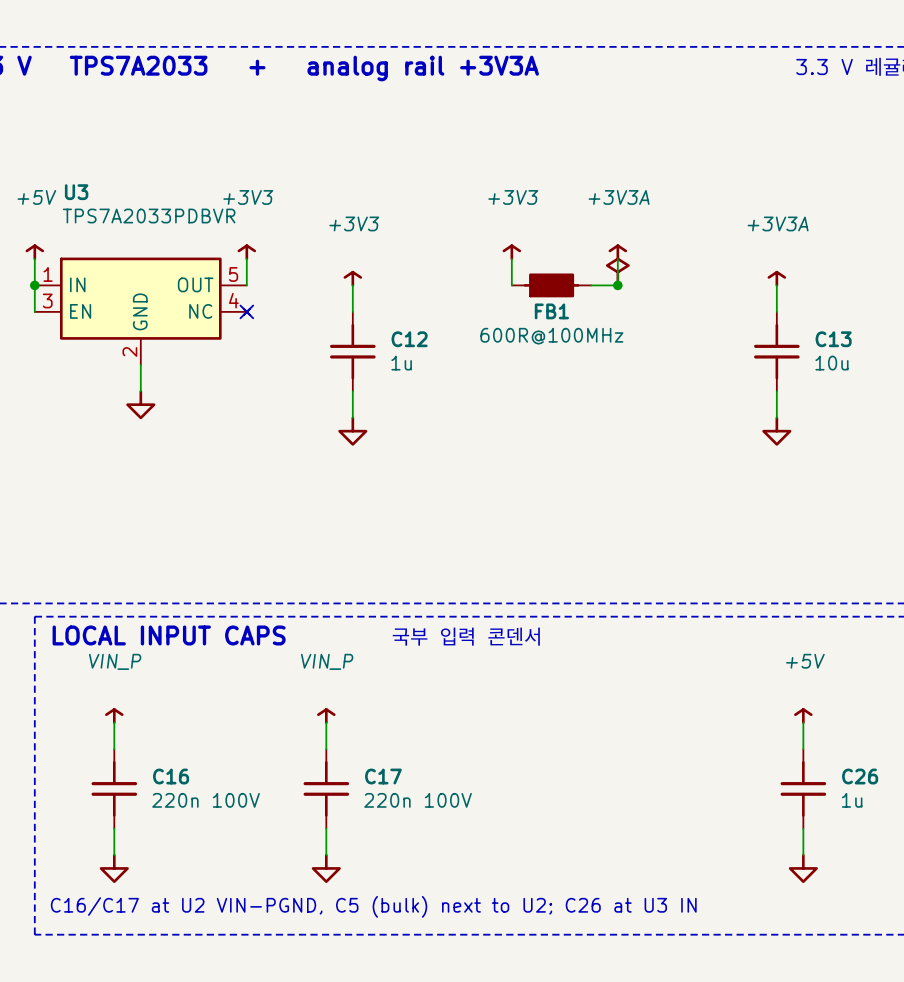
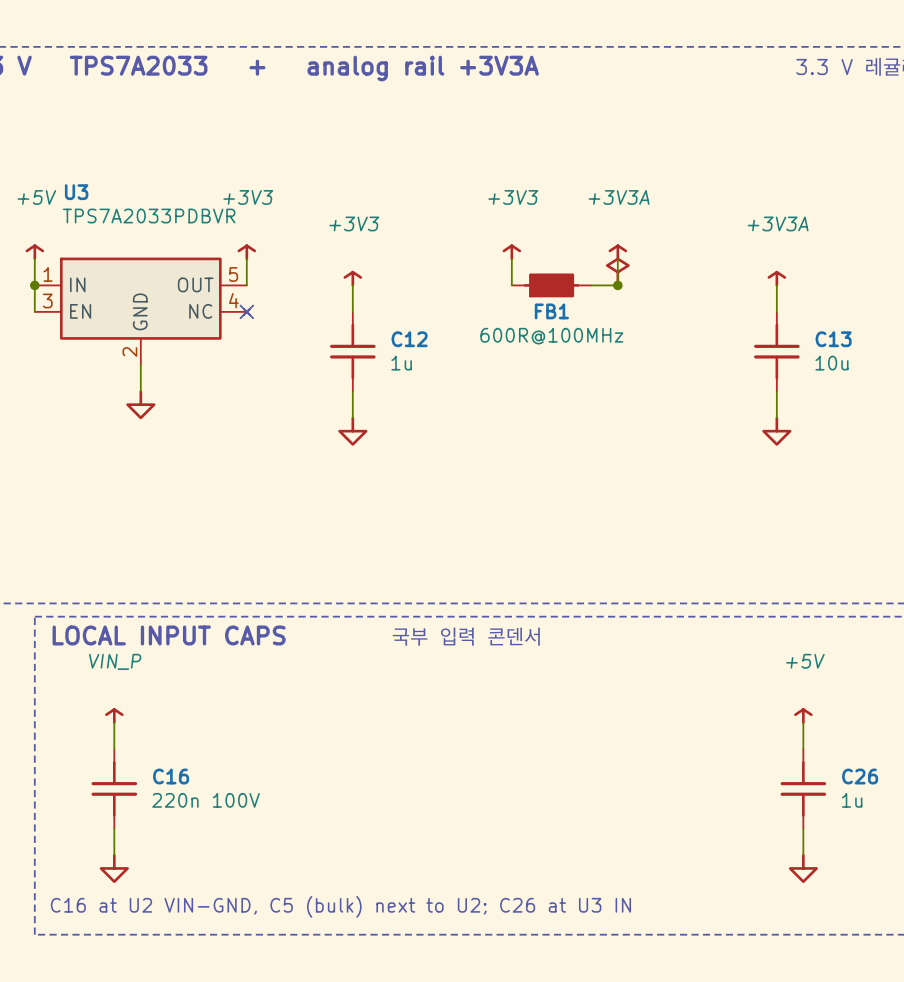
power symbol: VIN_P (326, 716) -> none
wire: (326, 722) (326, 749) -> none
C17: 220n 100V (326, 788) -> none
wire: (326, 828) (326, 855) -> none
power symbol: (326, 868) -> none
text: C16/C17 at U2 VIN-PGND, C5 (bulk) next to U2; C26 at U3 IN (373, 906) -> C16 at U2 VIN-GND, C5 (bulk) next to U2; C26 at U3 IN (340, 906)

